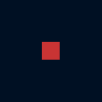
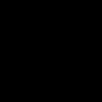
part: (50, 50) -> none

